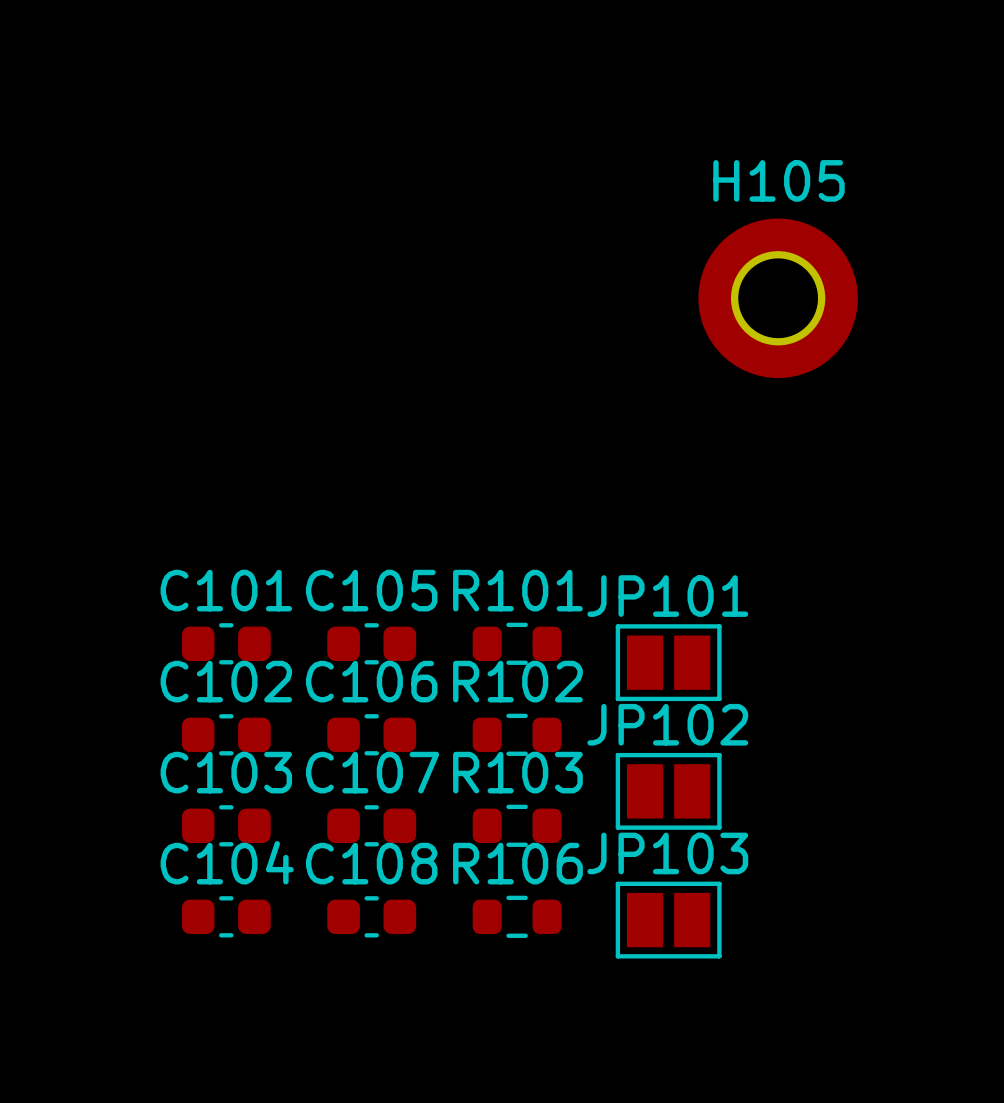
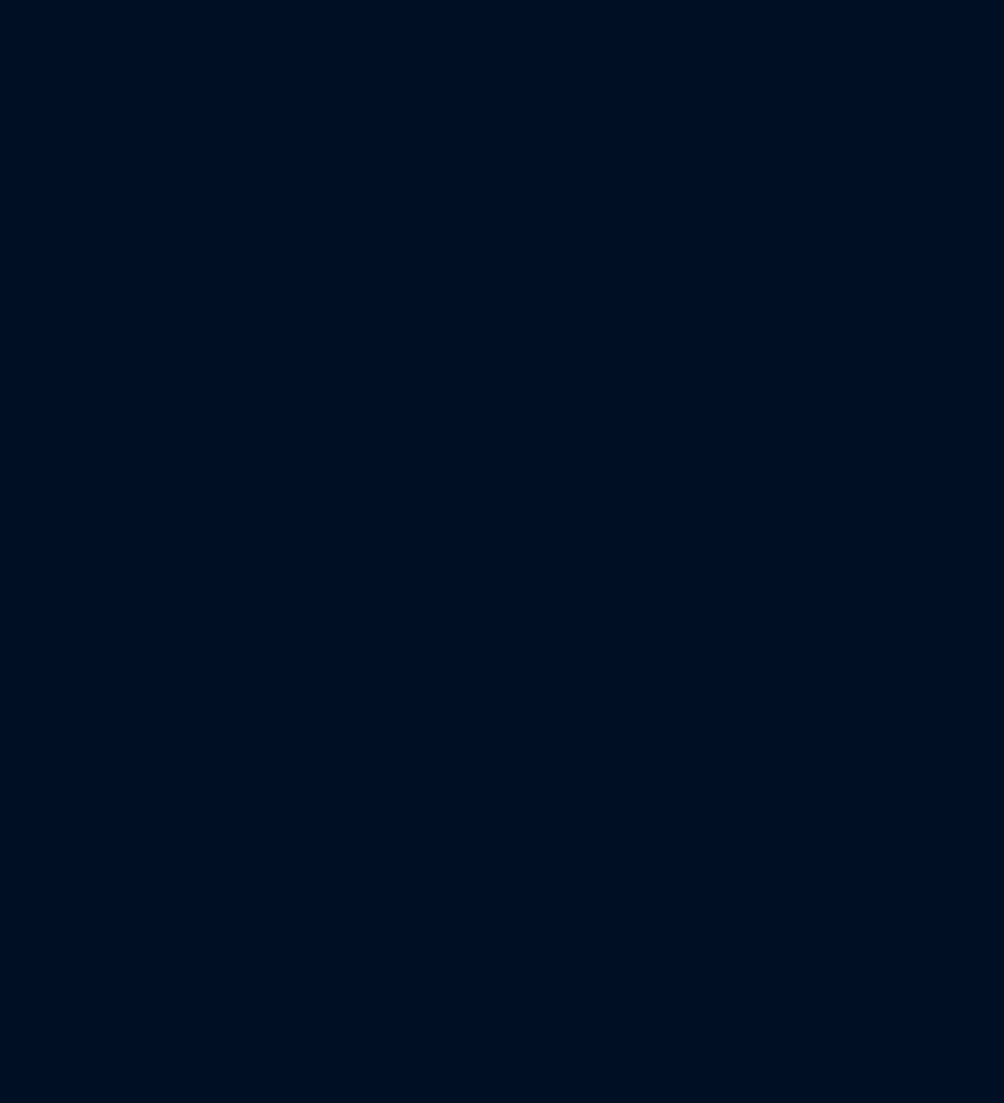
H105: (778, 298) -> none
C101: (226, 643) -> none
C105: (371, 643) -> none
R101: (517, 643) -> none
JP101: (668, 662) -> none
C102: (226, 734) -> none
C106: (371, 734) -> none
R102: (517, 734) -> none
JP102: (668, 791) -> none
C103: (226, 825) -> none
C107: (371, 825) -> none
R103: (517, 825) -> none
C104: (226, 916) -> none
C108: (371, 916) -> none
R106: (517, 916) -> none
JP103: (668, 920) -> none

